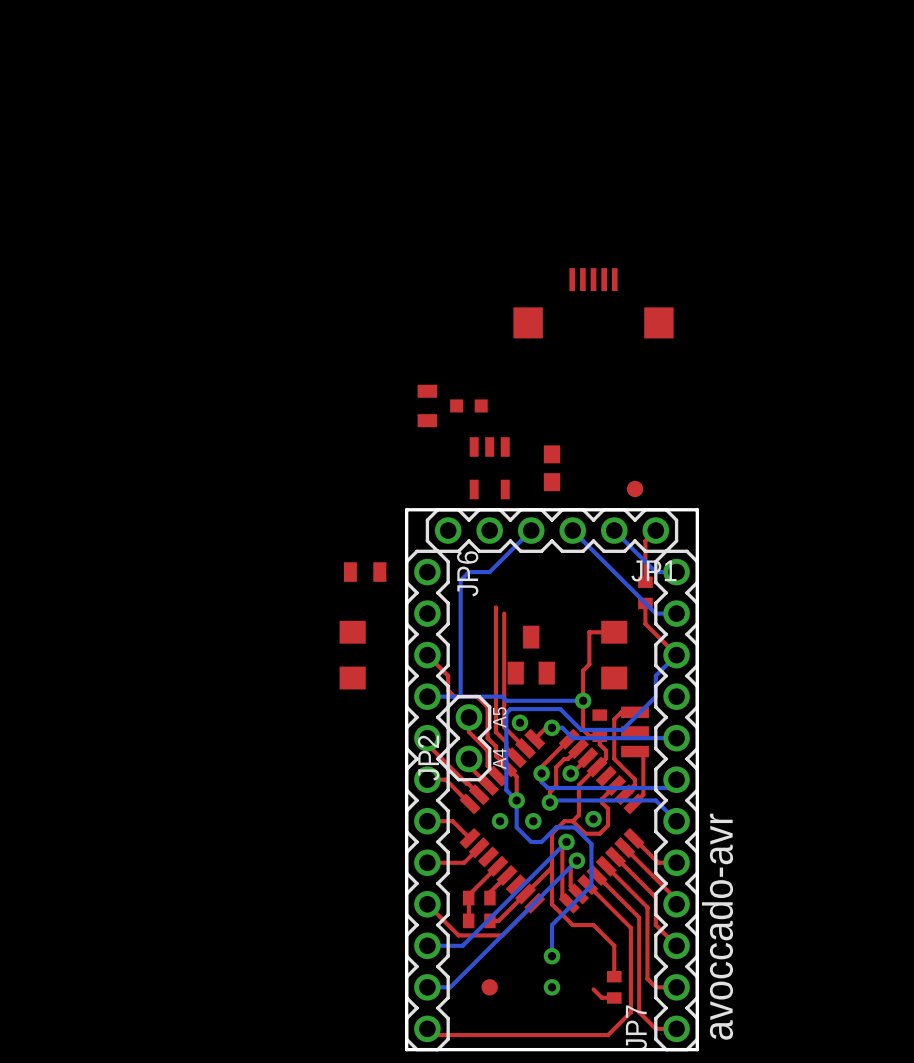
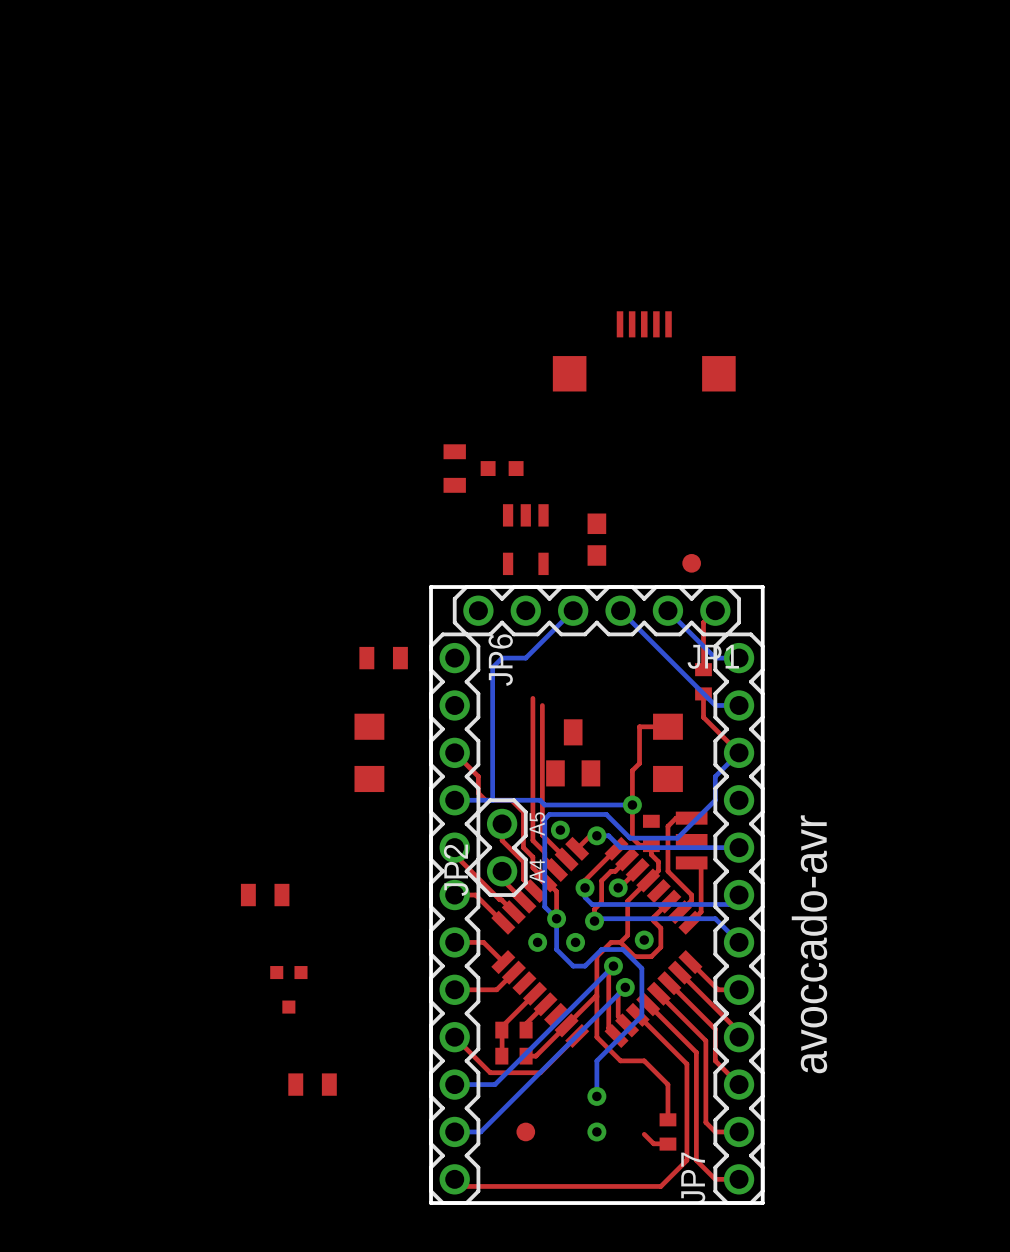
part: none -> (265, 895)
part: none -> (288, 989)
text position: avoccado-avr (717, 926) -> avoccado-avr (809, 944)
part: none -> (312, 1084)

